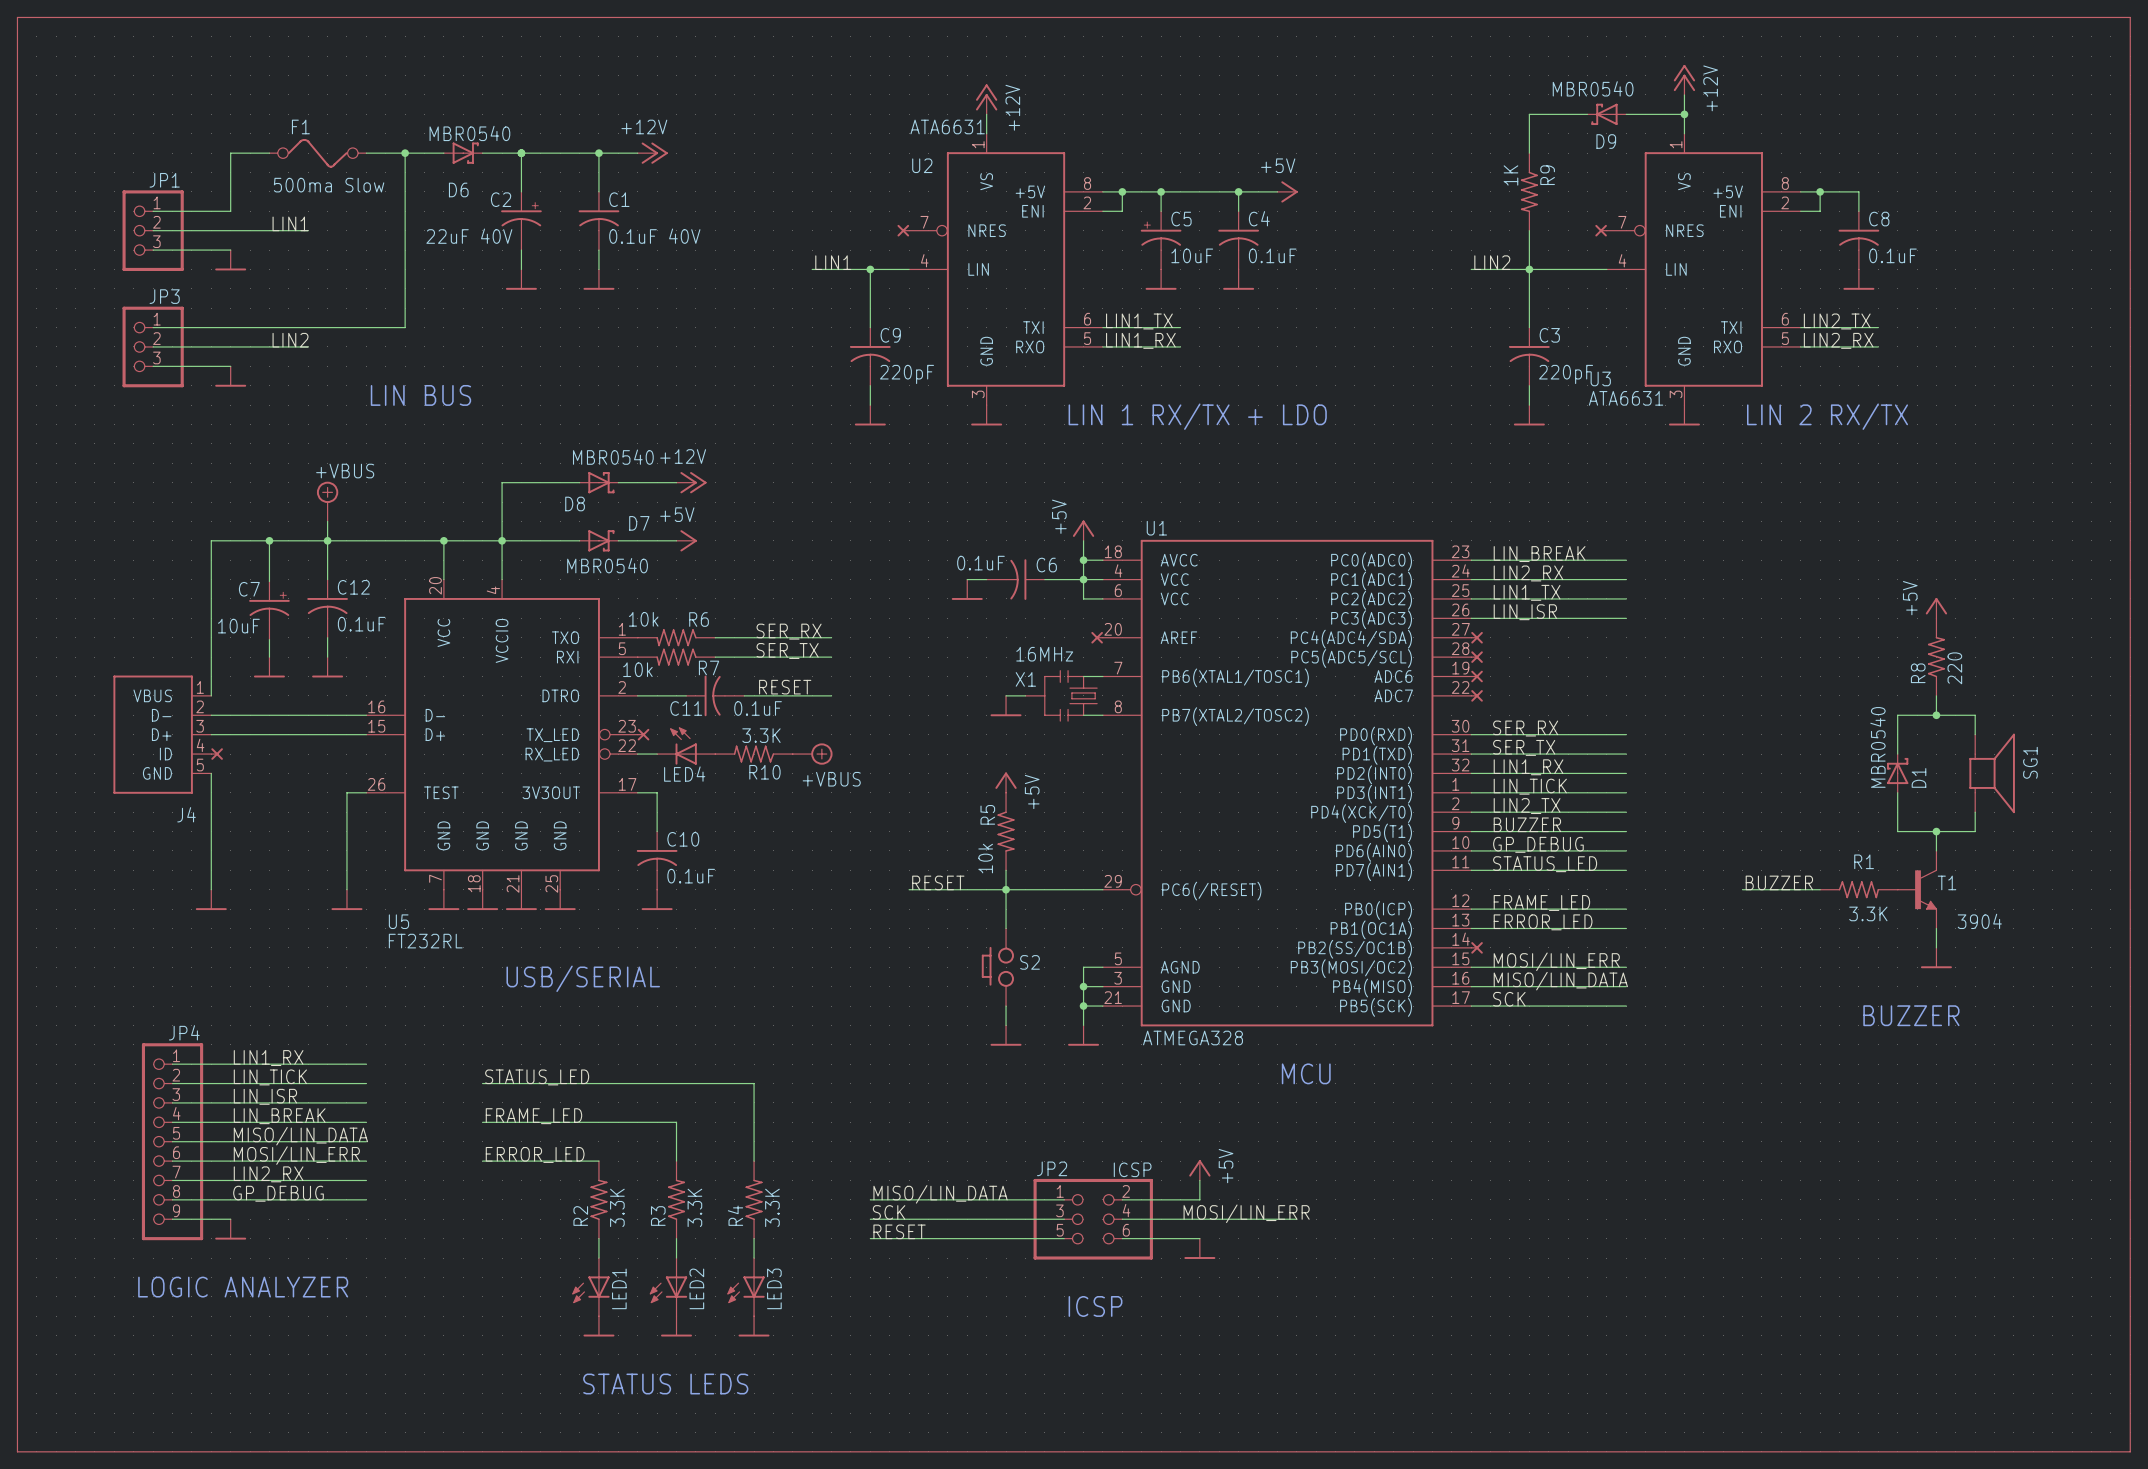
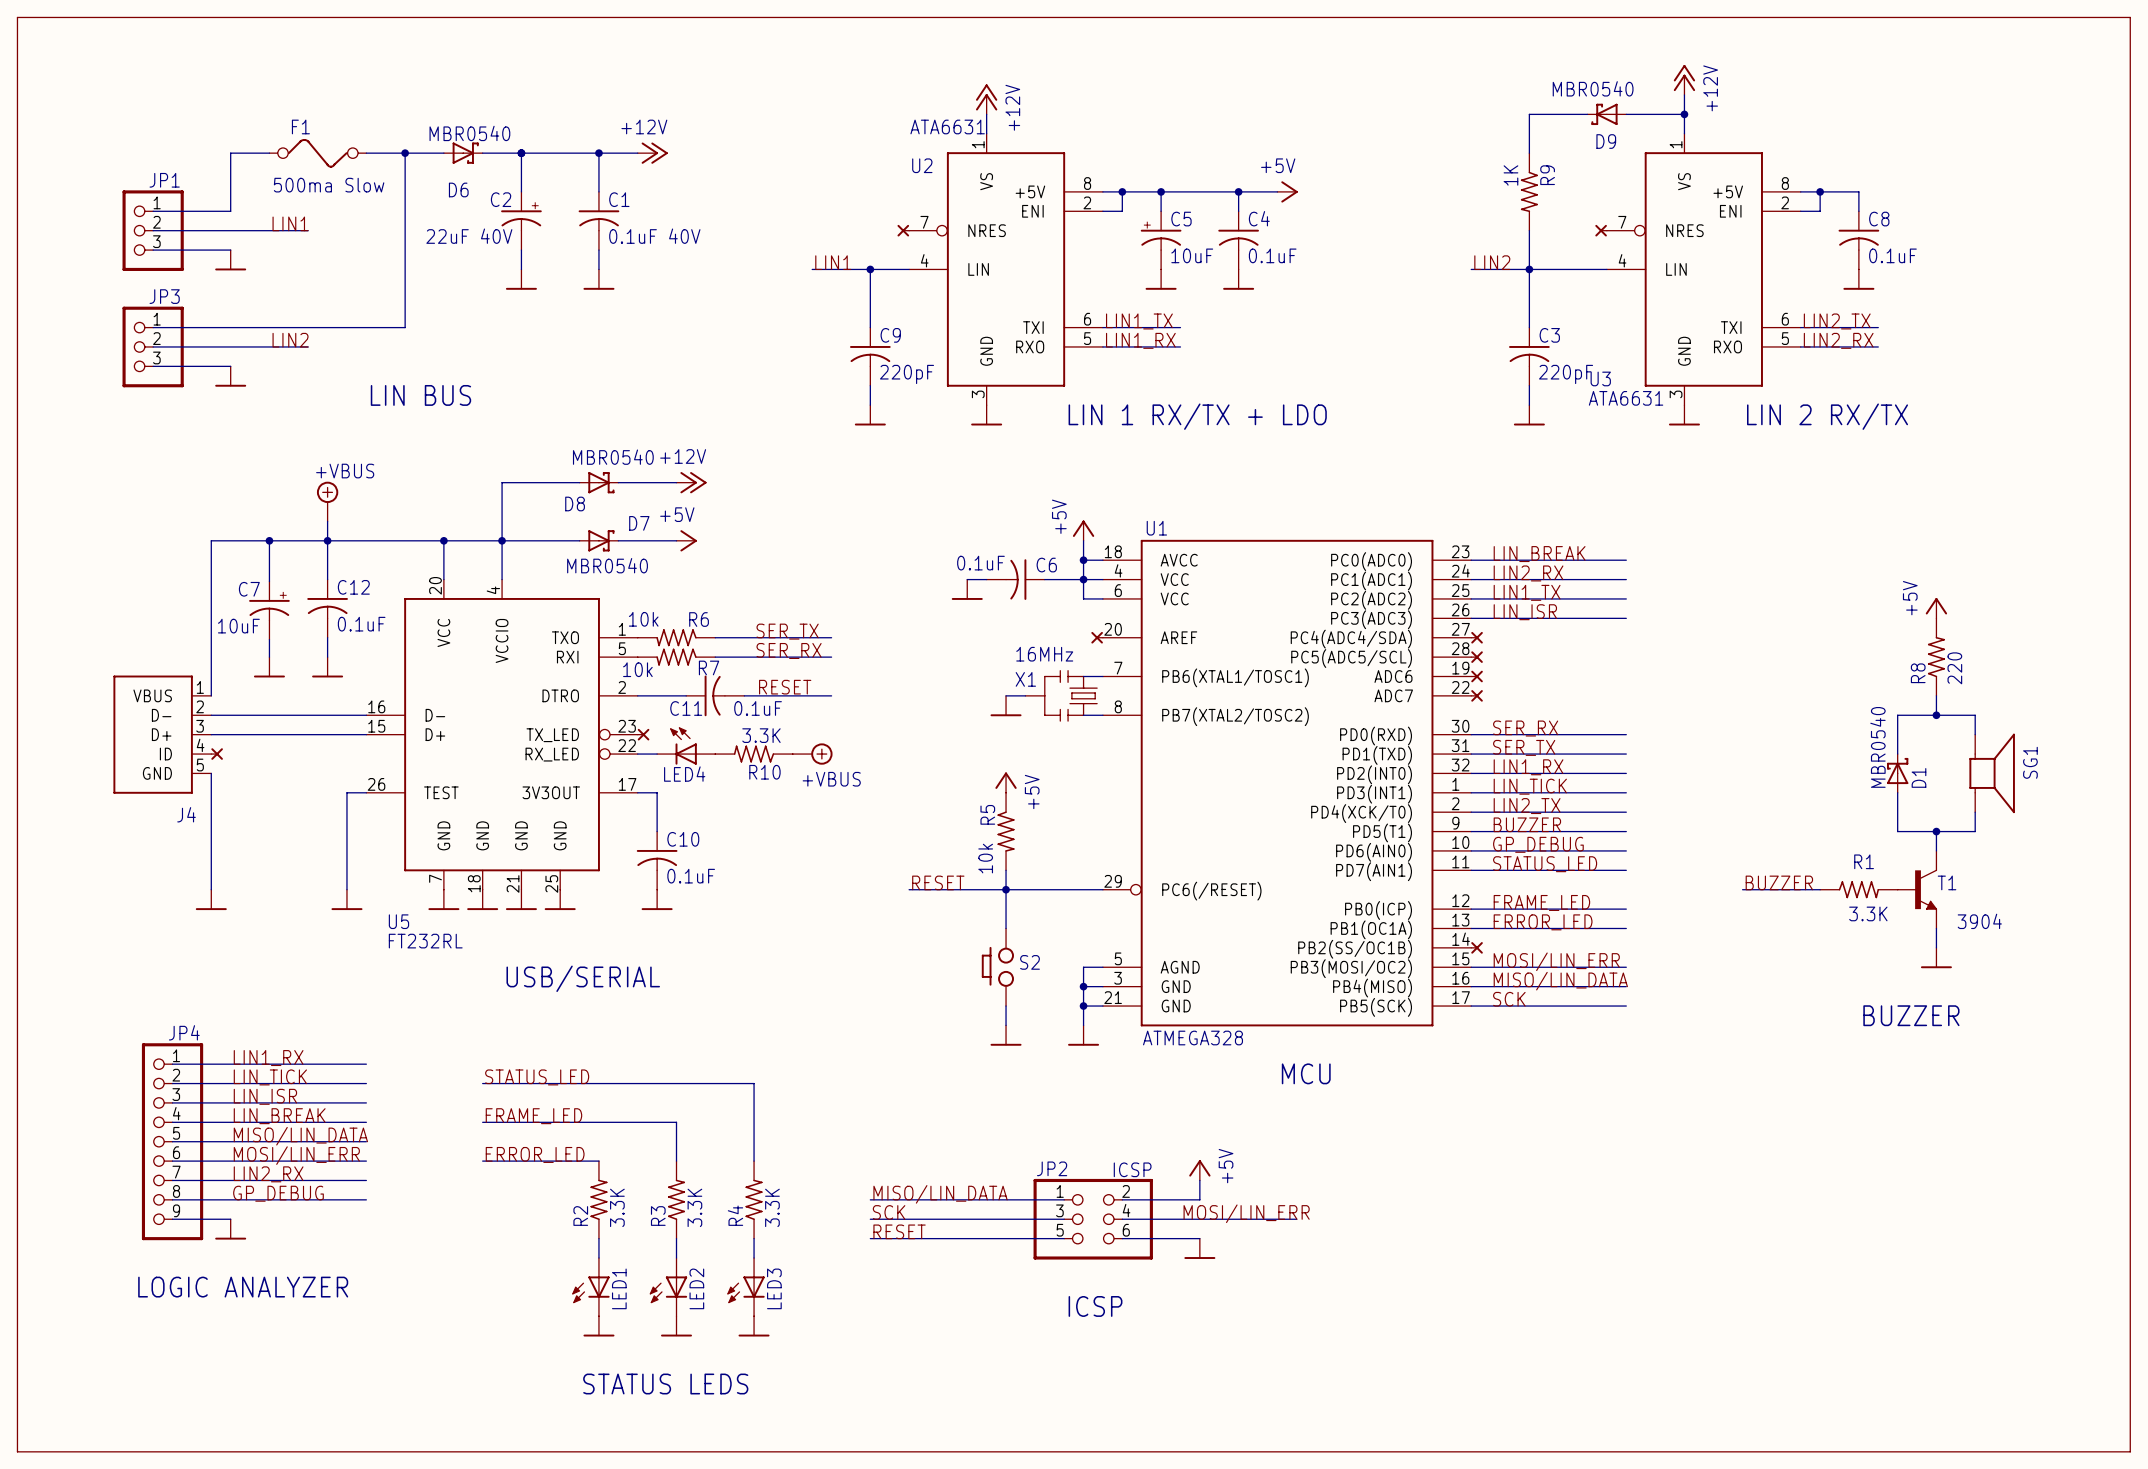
label: SER_RX (789, 631) -> SER_TX (787, 631)
label: SER_TX (787, 650) -> SER_RX (789, 650)

